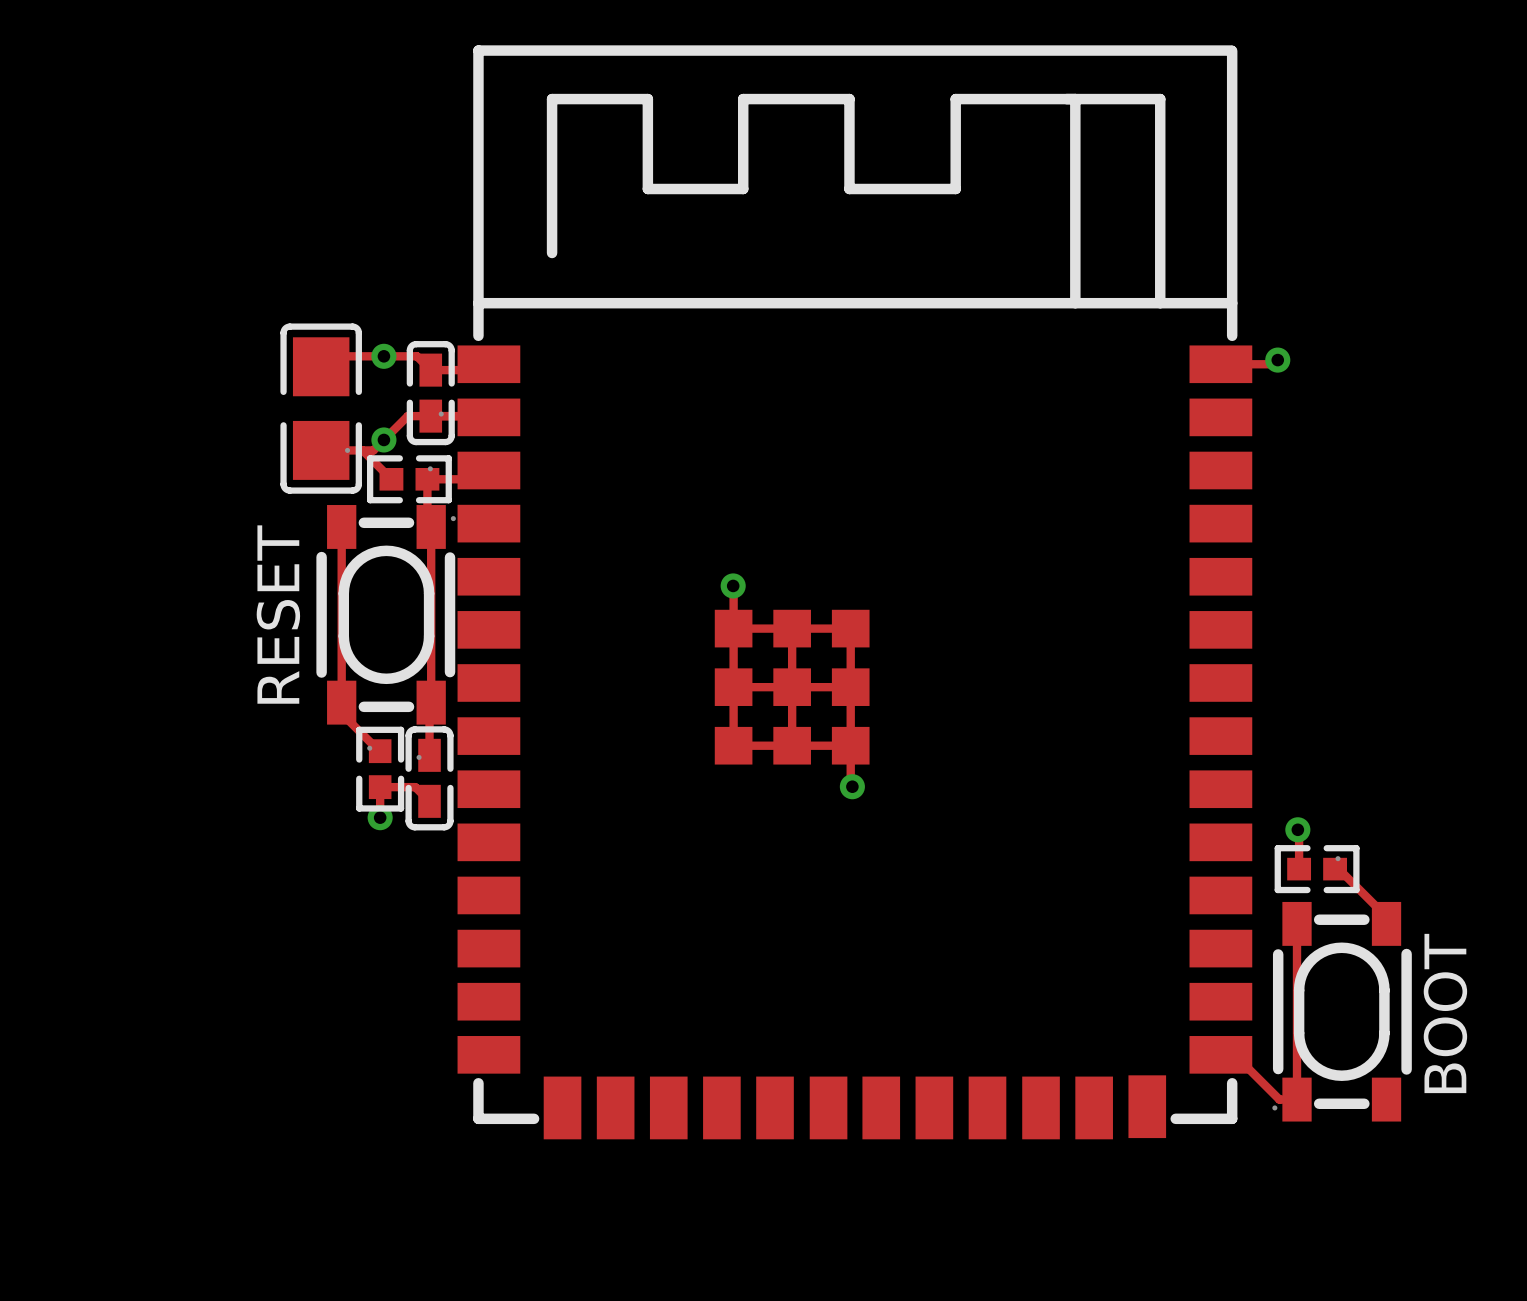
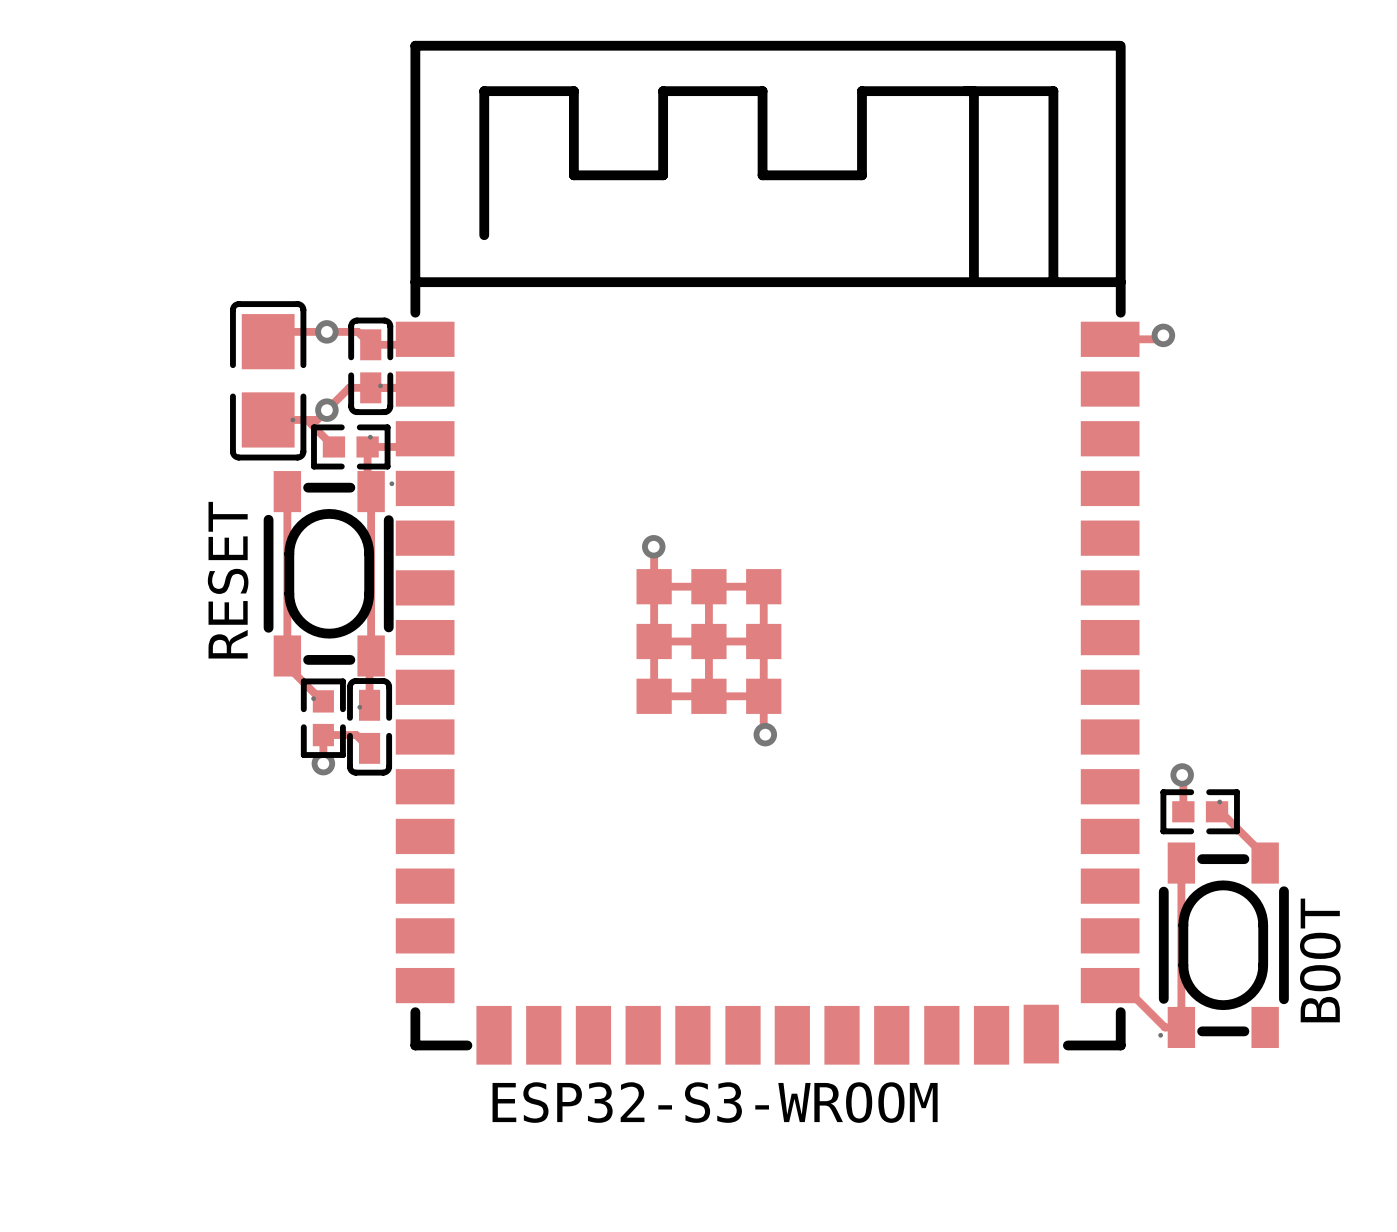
text: none -> ESP32-S3-WROOM (715, 1102)

